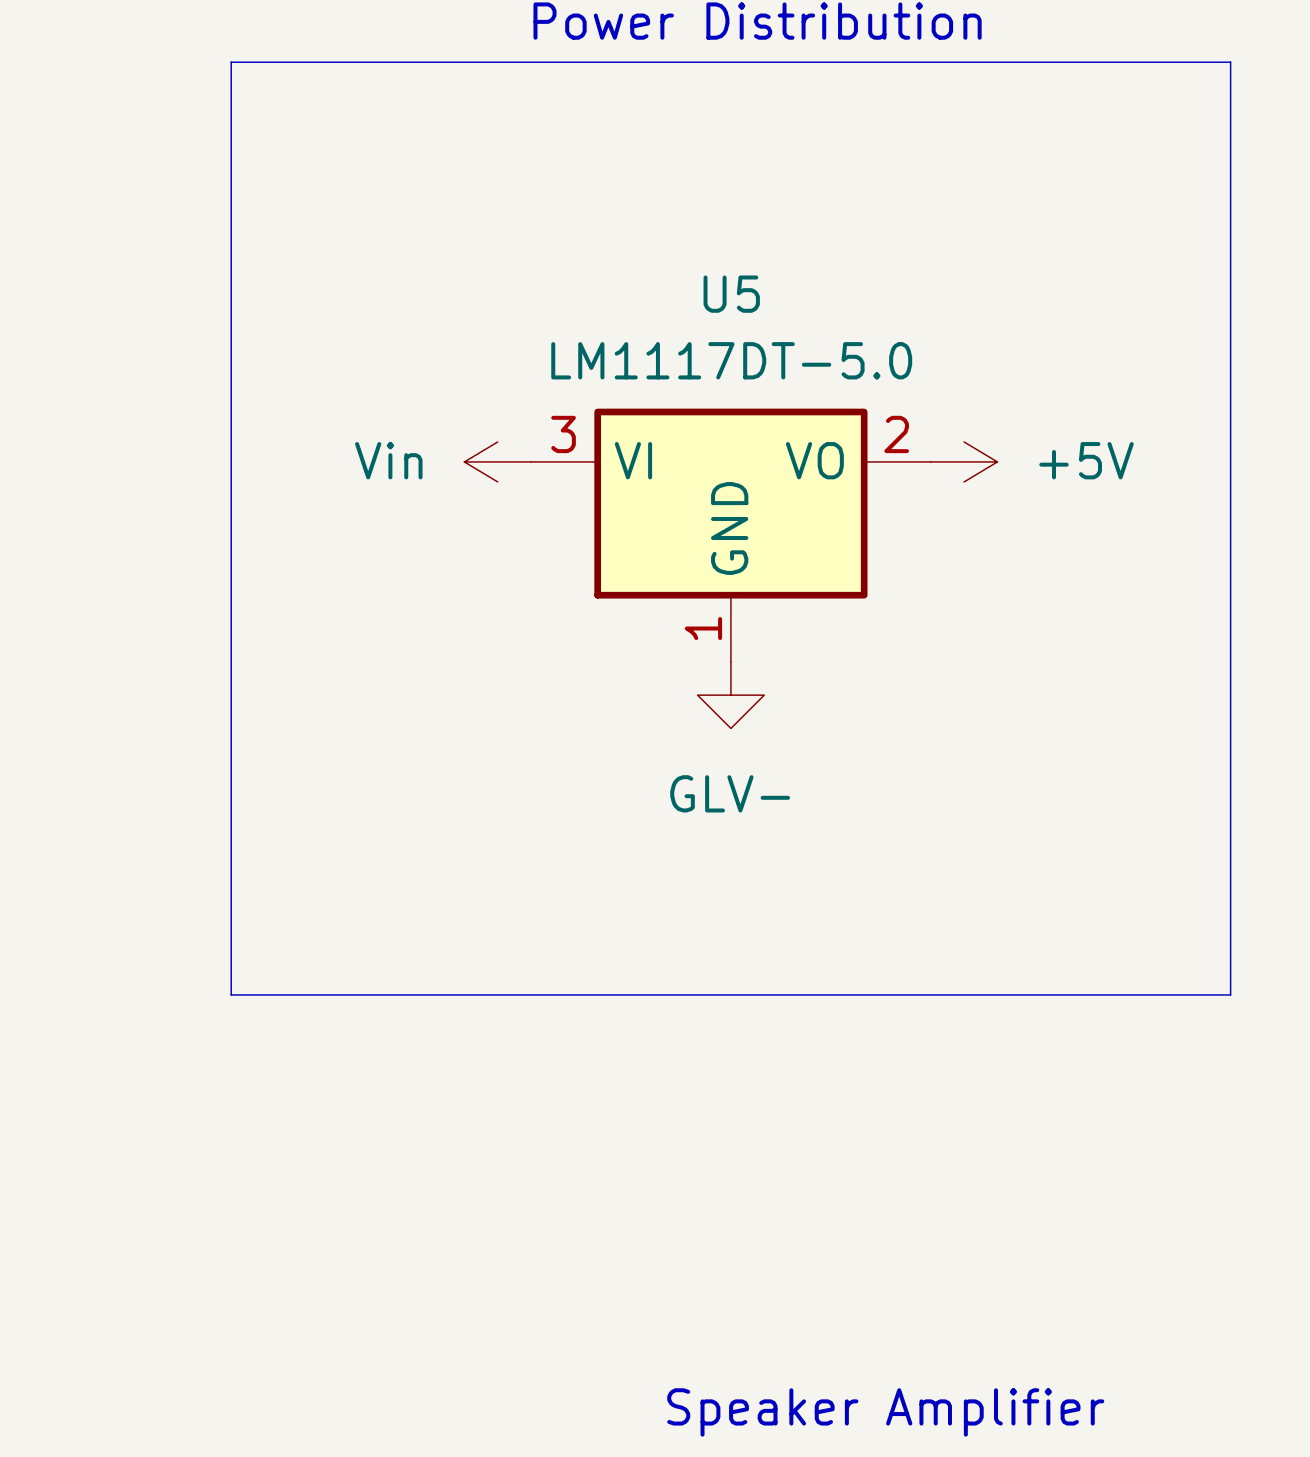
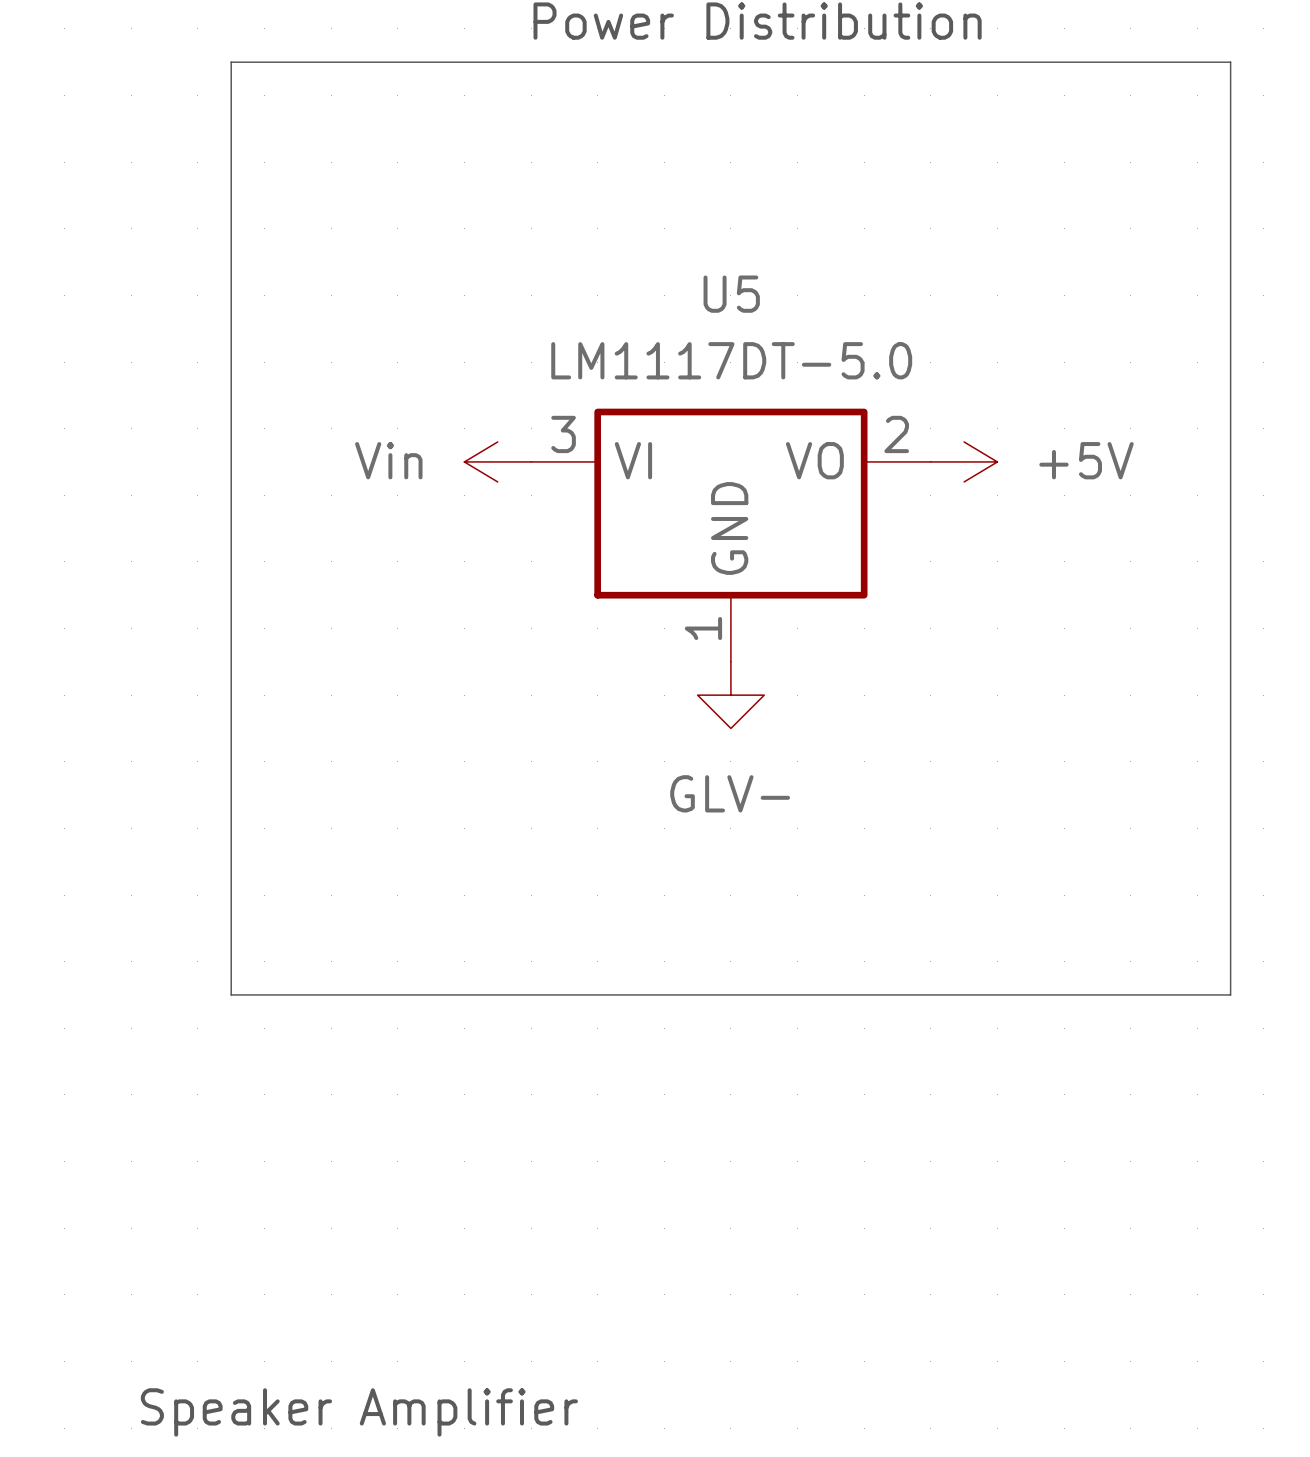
text position: Speaker Amplifier (885, 1412) -> Speaker Amplifier (359, 1412)

